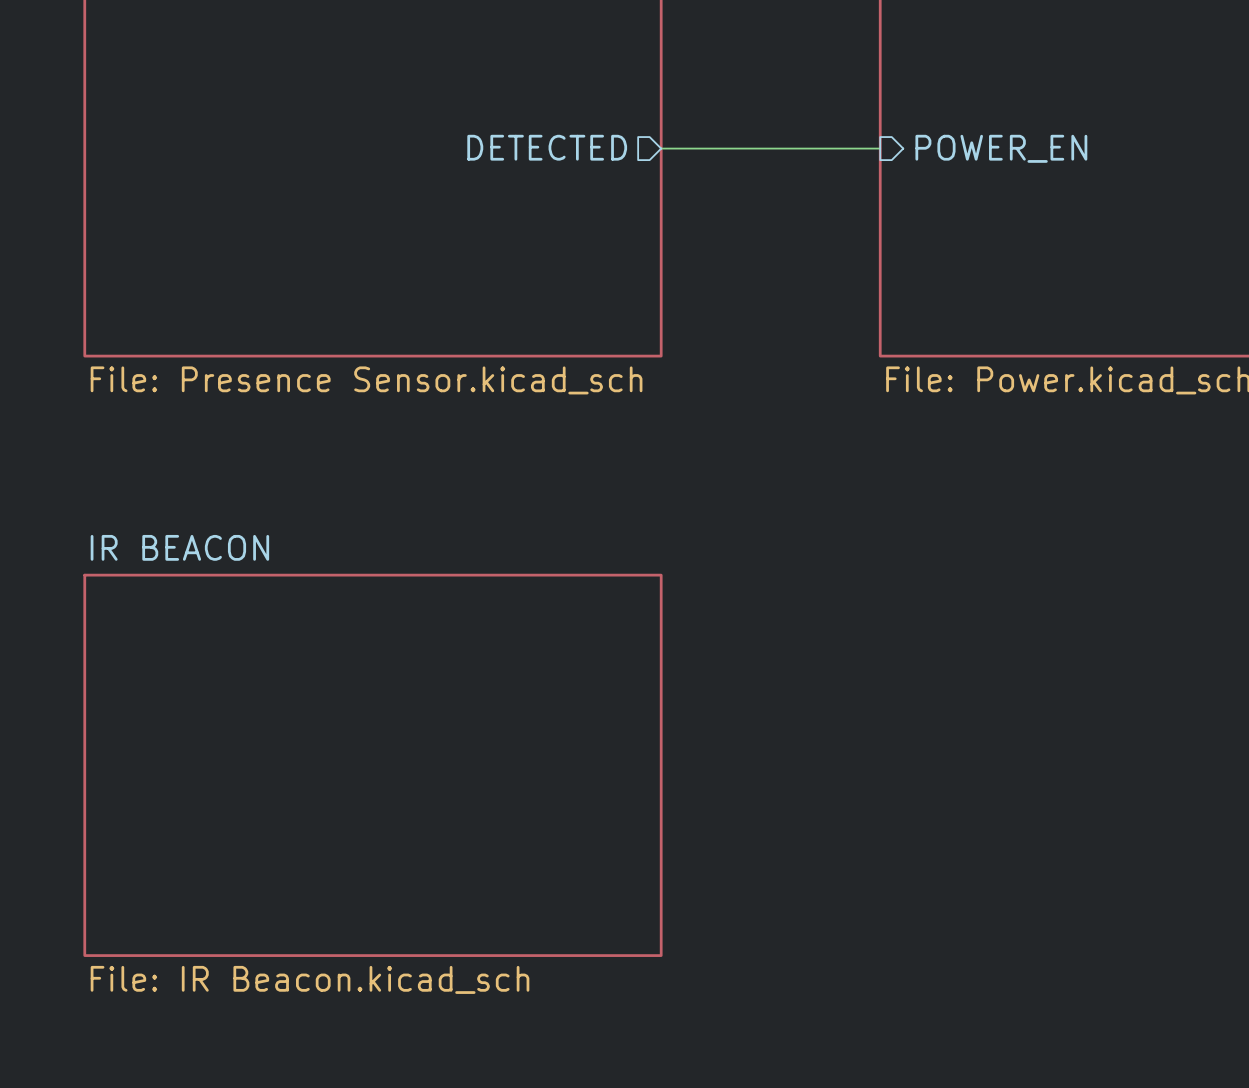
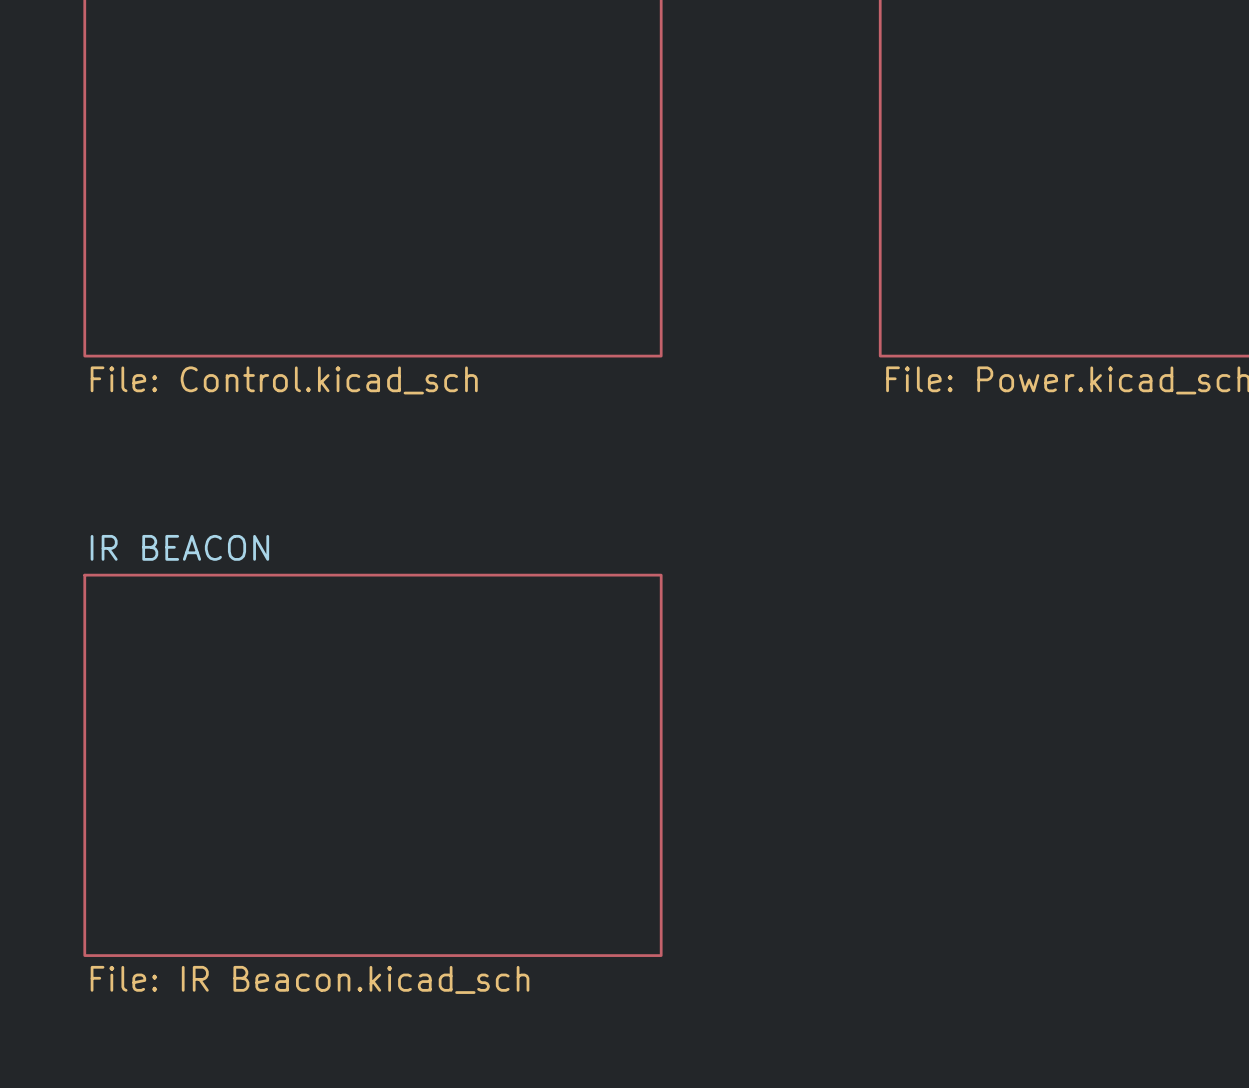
sheet pin: DETECTED (547, 147) -> none
wire: (661, 148) (880, 148) -> none
sheet pin: POWER_EN (1001, 148) -> none
sheet value: File: Presence Sensor.kicad_sch (366, 380) -> File: Control.kicad_sch (284, 380)

